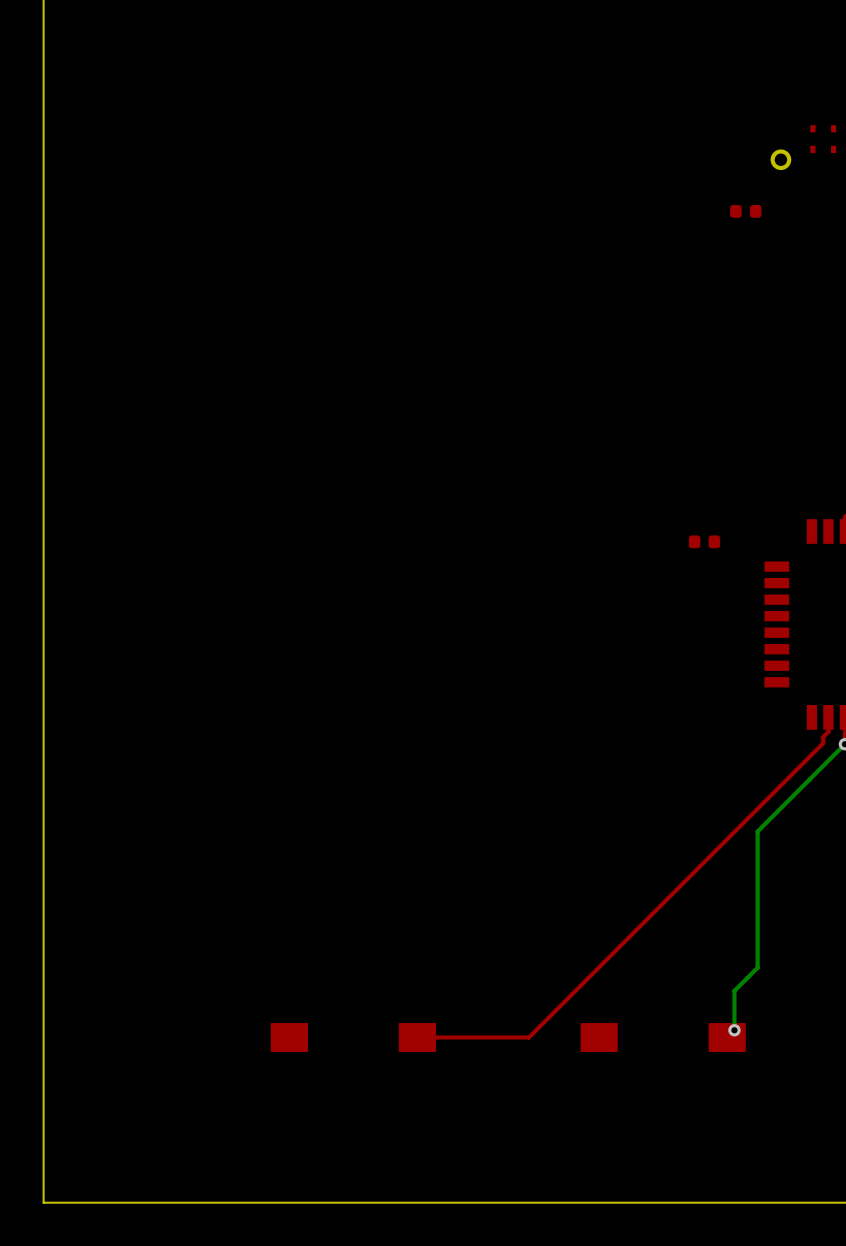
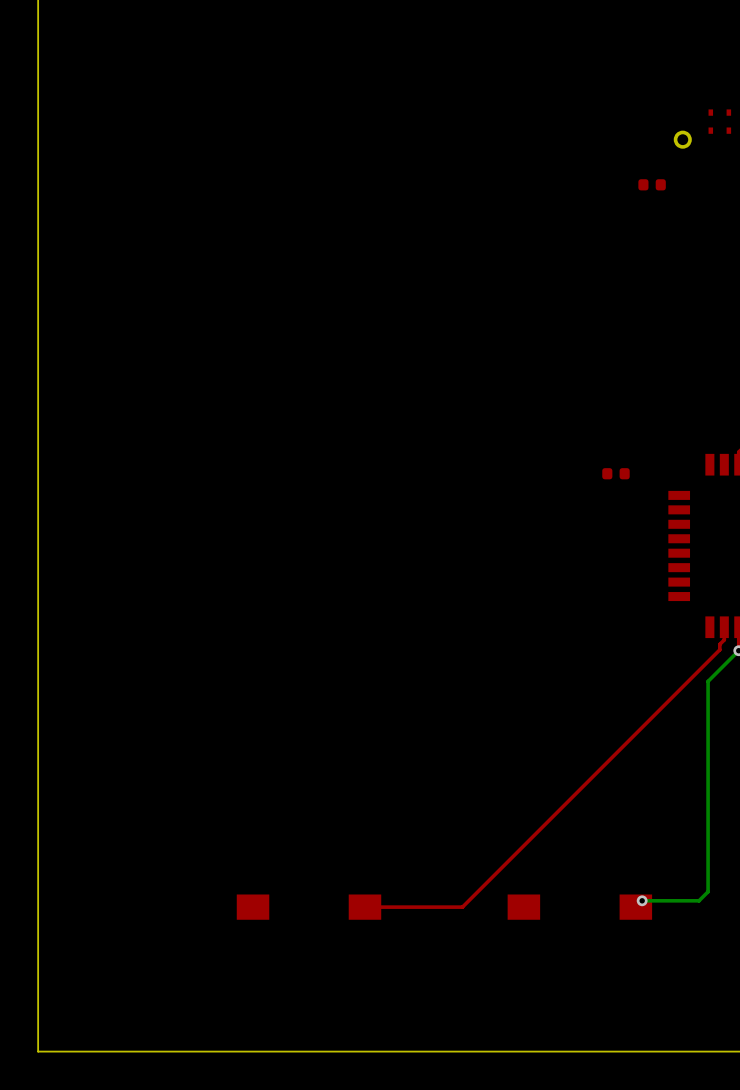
bottom track: (809, 779) (757, 831) (757, 967) (734, 990) (734, 1030) -> (708, 681) (708, 891) (699, 900) (642, 900)

